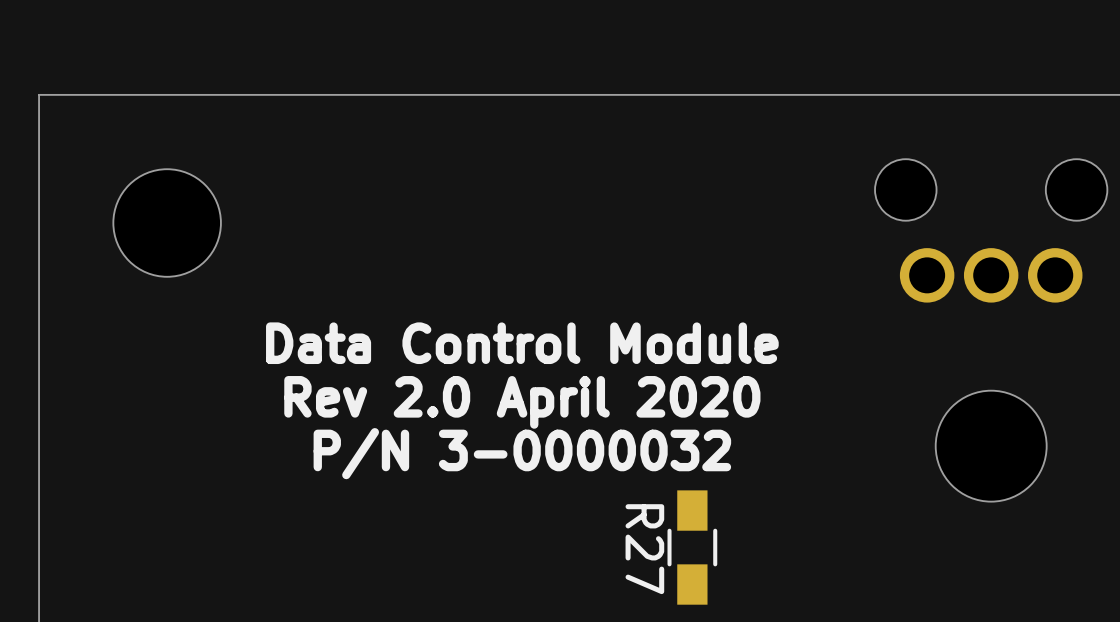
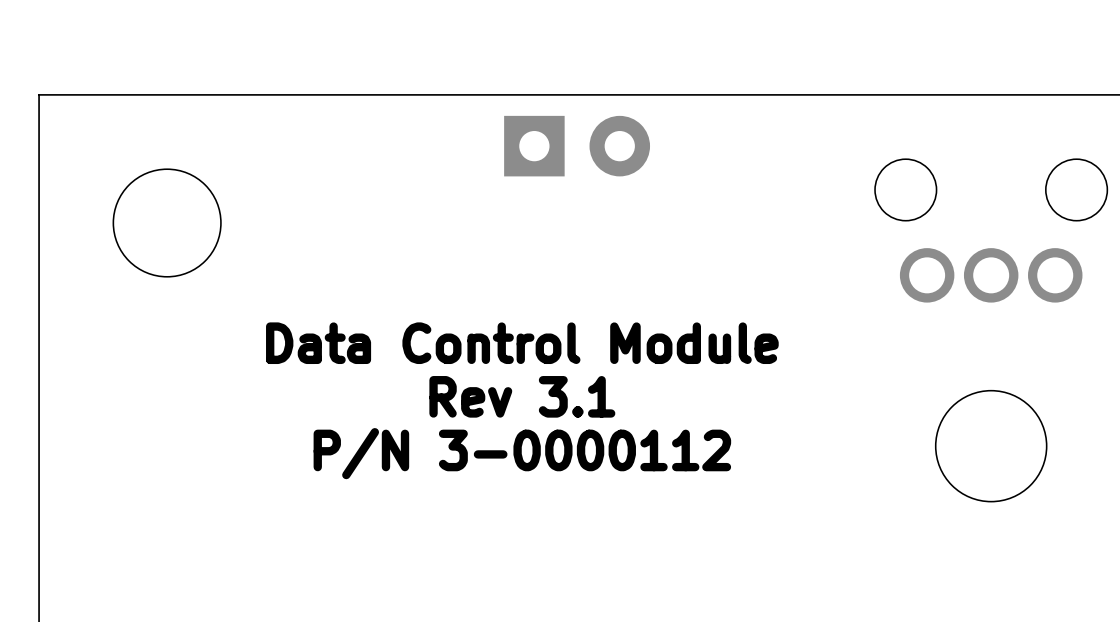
part: none -> (577, 146)
text: Rev 2.0 April 2020 (522, 402) -> Rev 3.1 (522, 396)
text: P/N 3-0000032 (522, 453) -> P/N 3-0000112 (522, 453)
R27: (692, 547) -> none

